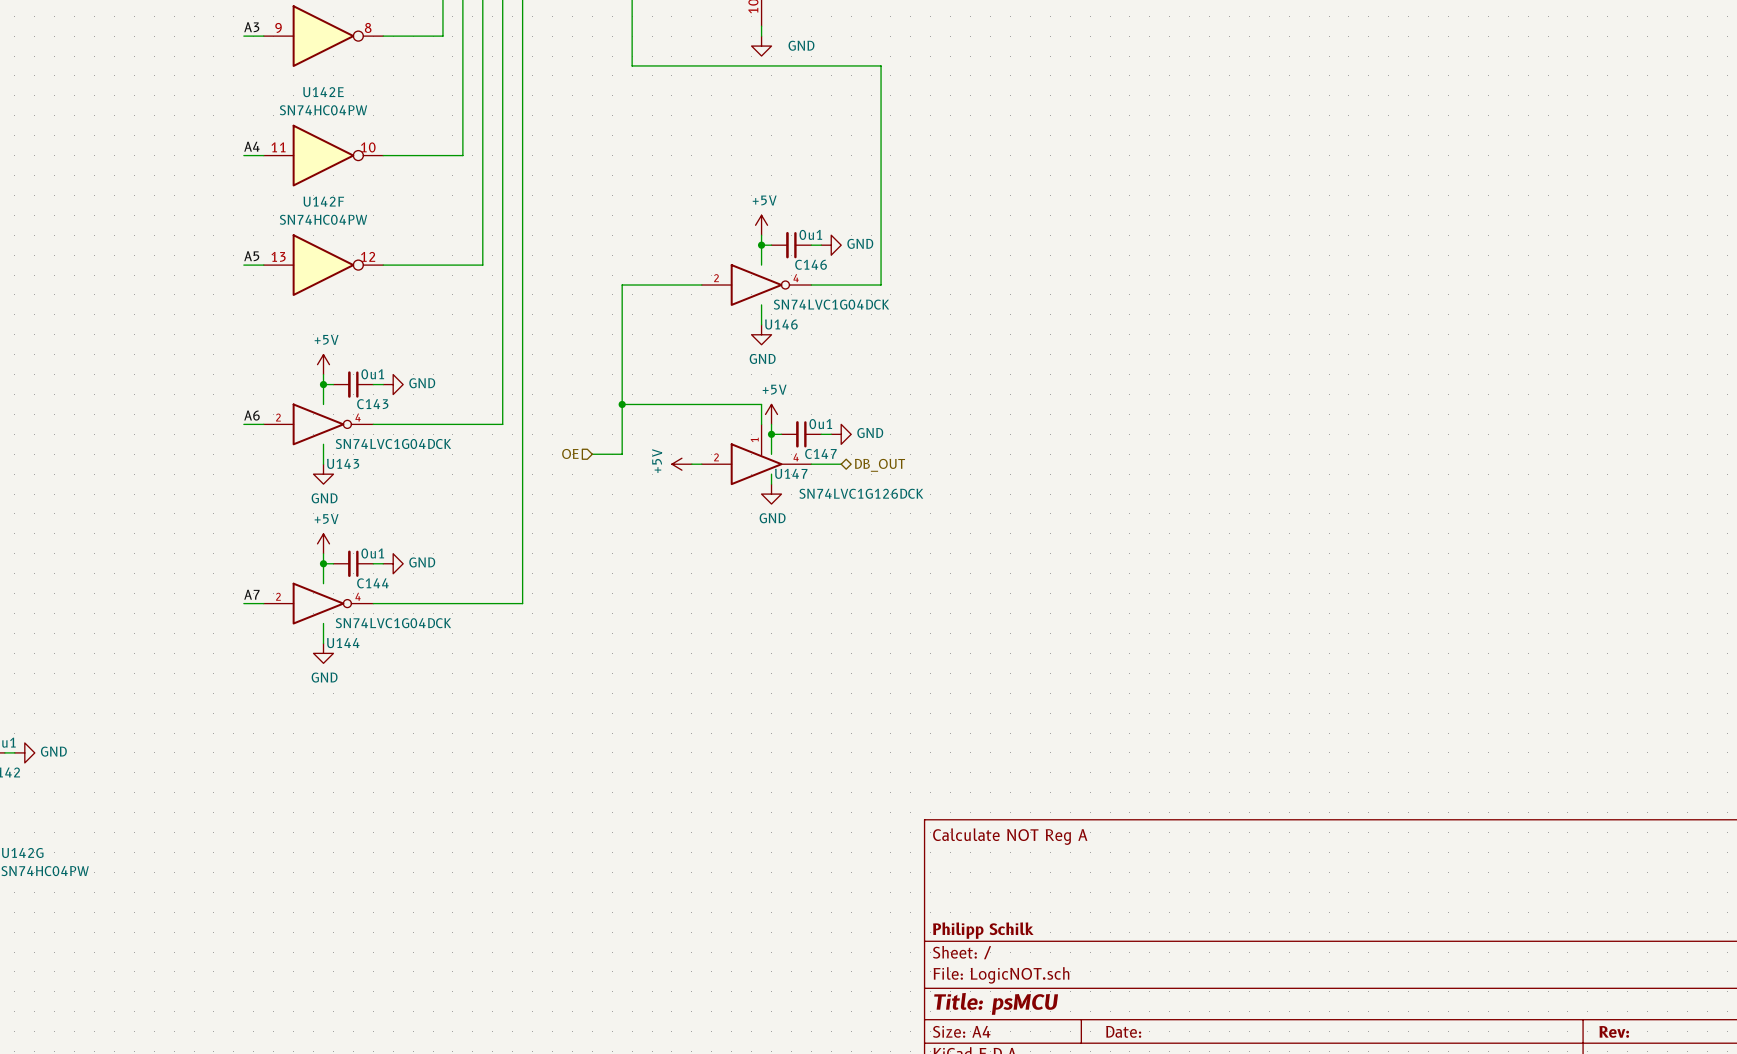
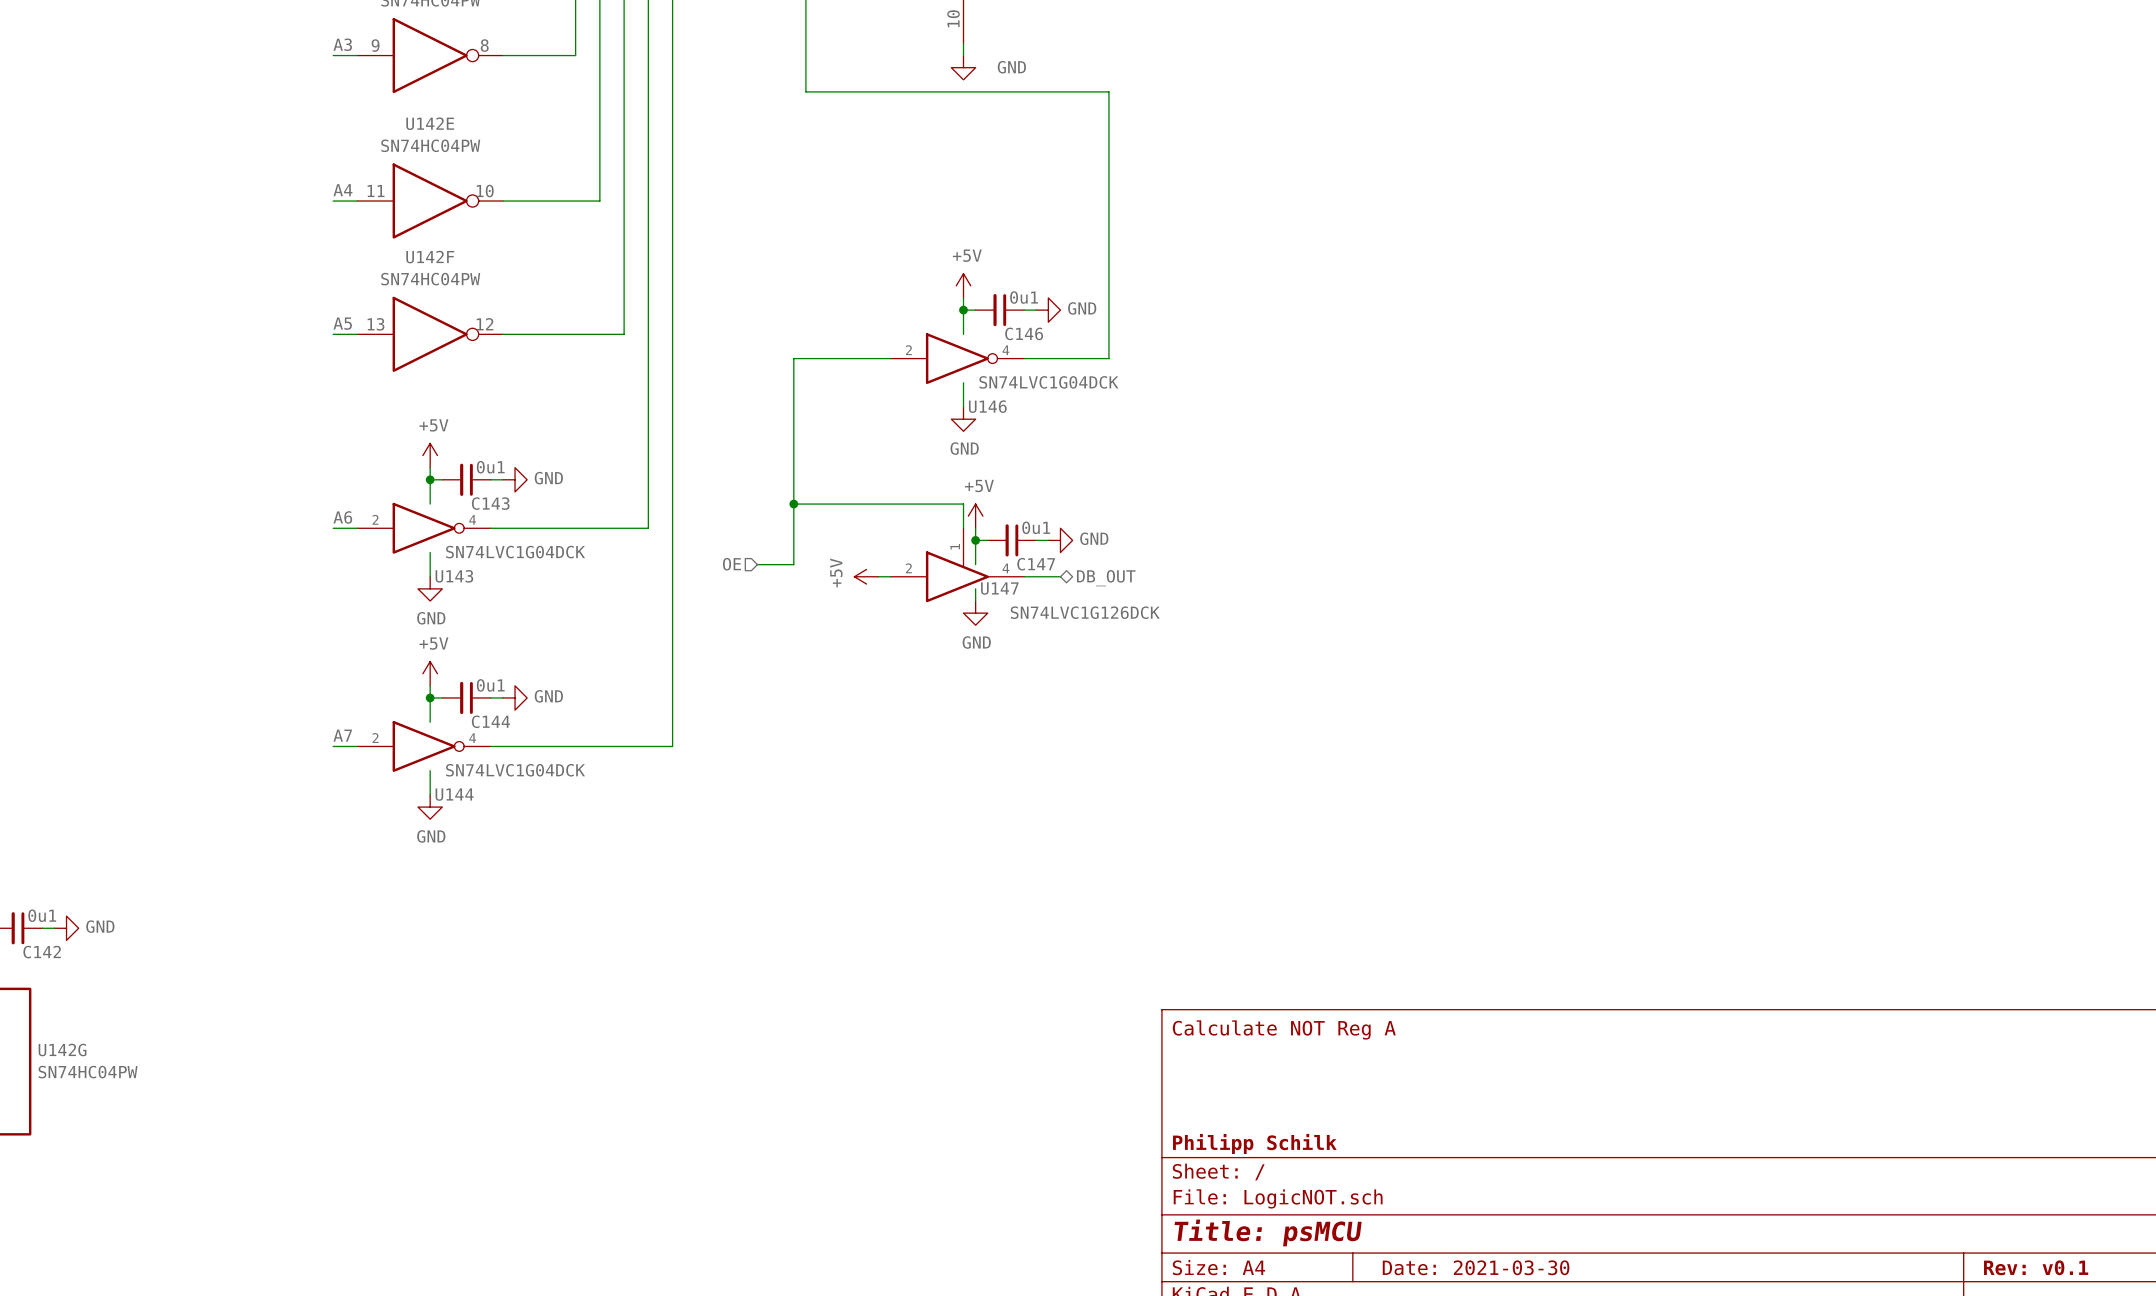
title block: Date: (1123, 1031) -> Date: 2021-03-30 (1476, 1267)
title block: Rev: (1614, 1031) -> Rev: v0.1 (2036, 1267)

